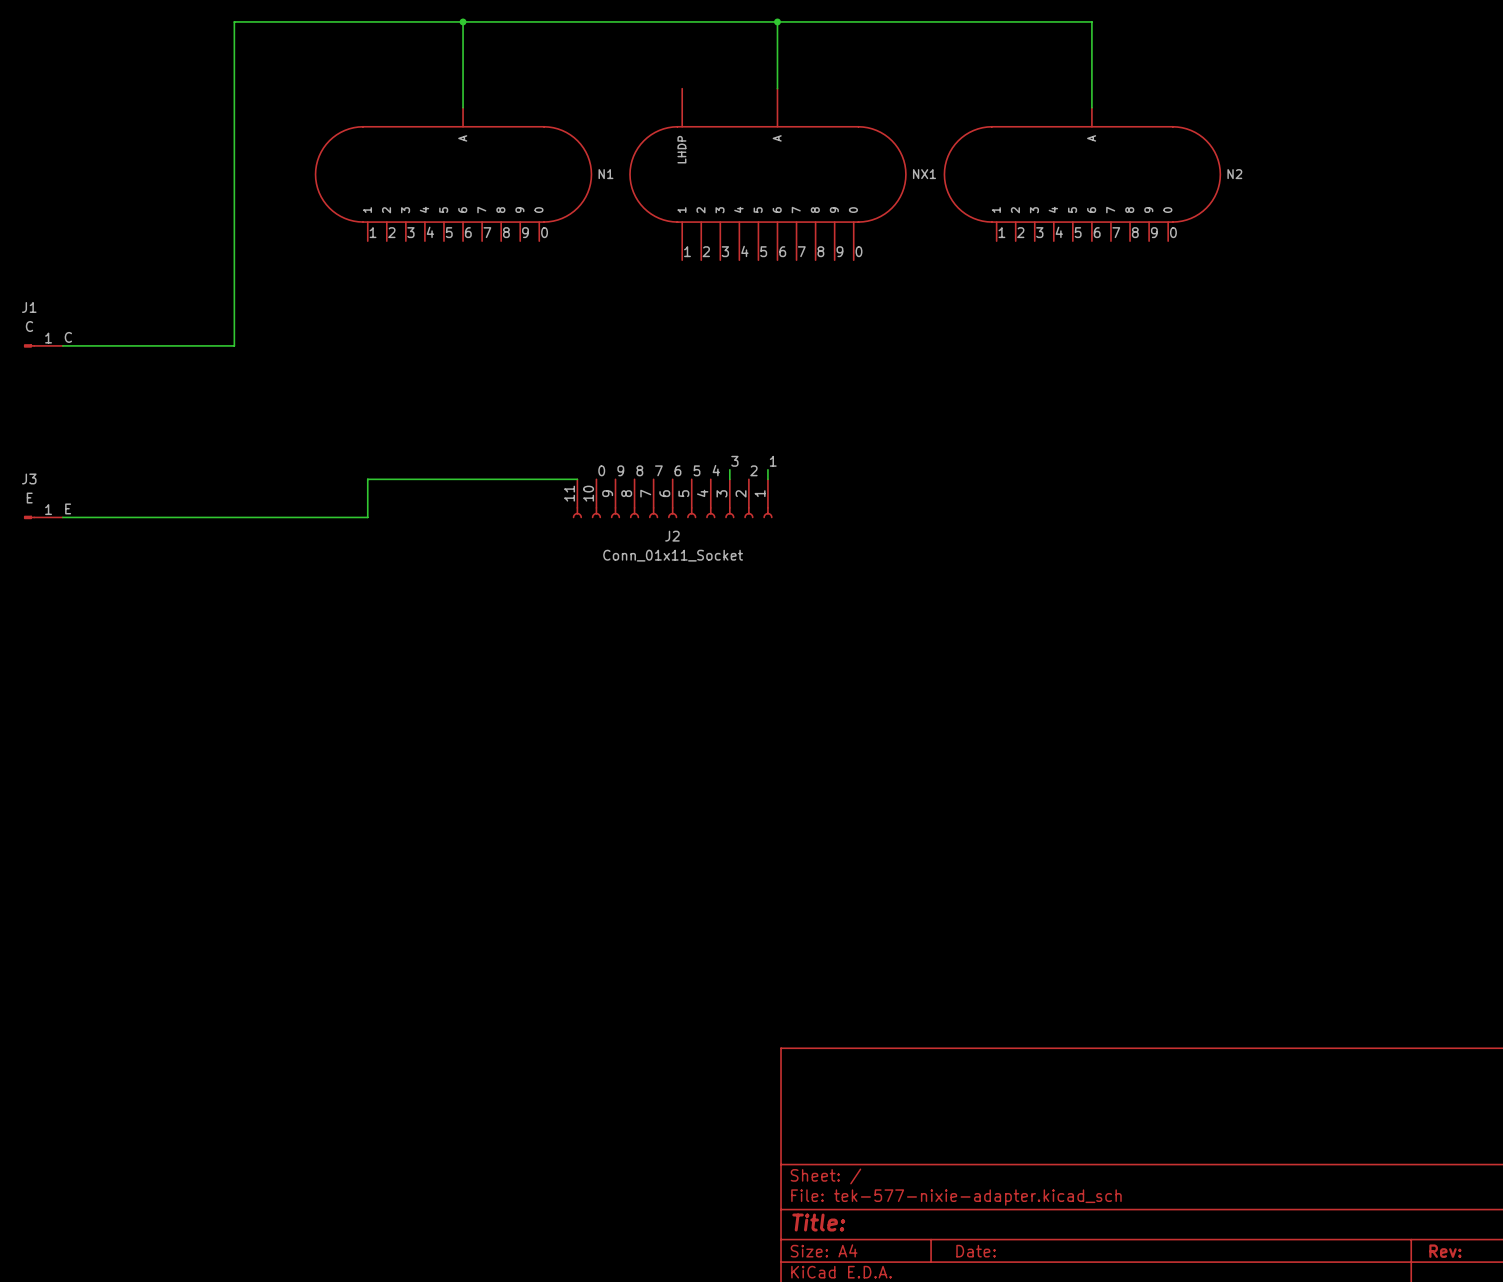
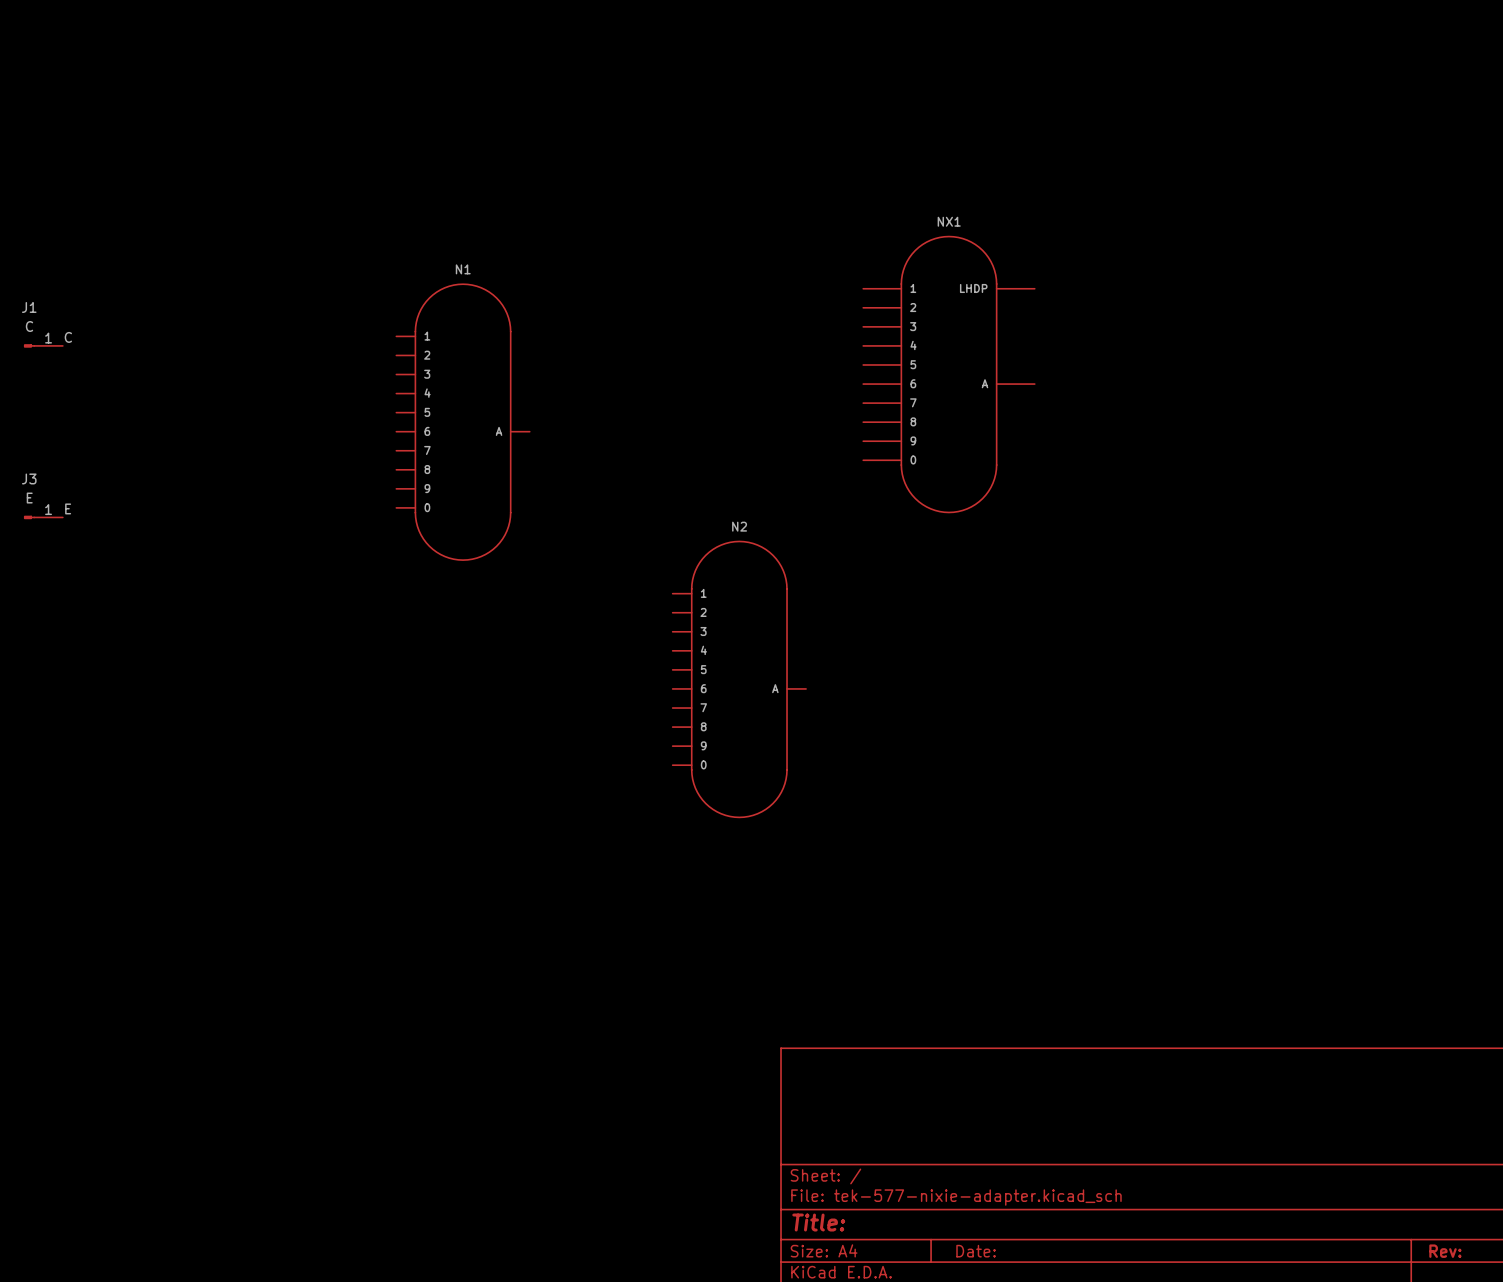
wire: (463, 21) (463, 107) -> none
junction: (463, 21) -> none
wire: (777, 21) (777, 88) -> none
junction: (777, 21) -> none
wire: (1091, 107) (1091, 21) (234, 21) (234, 345) (62, 345) -> none
N1 rotation: 0° (453, 174) -> 90° clockwise (463, 422)
N1 position: (453, 174) -> (463, 422)
N1 name position: N1 (605, 174) -> N1 (463, 269)
NX1 rotation: 0° (767, 174) -> 90° clockwise (948, 374)
NX1 position: (767, 174) -> (948, 374)
NX1 name position: NX1 (924, 174) -> NX1 (949, 221)
N2 rotation: 0° (1082, 174) -> 90° clockwise (739, 679)
N2 position: (1082, 174) -> (739, 679)
N2 name position: N2 (1234, 174) -> N2 (739, 526)
label: 1 (373, 232) -> none
label: 2 (391, 232) -> none
label: 3 (410, 232) -> none
label: 4 (430, 232) -> none
label: 5 (449, 232) -> none
label: 6 (468, 232) -> none
label: 7 (487, 232) -> none
label: 8 (506, 232) -> none
label: 9 (525, 232) -> none
label: 0 (544, 232) -> none
label: 1 (1001, 232) -> none
label: 2 (1020, 232) -> none
label: 3 (1039, 232) -> none
label: 4 (1059, 232) -> none
label: 5 (1078, 232) -> none
label: 6 (1097, 232) -> none
label: 7 (1116, 232) -> none
label: 8 (1135, 232) -> none
label: 9 (1154, 232) -> none
label: 0 (1173, 232) -> none
label: 1 (687, 251) -> none
label: 2 (706, 251) -> none
label: 3 (725, 251) -> none
label: 4 (744, 251) -> none
label: 5 (763, 251) -> none
label: 6 (782, 251) -> none
label: 7 (801, 251) -> none
label: 8 (820, 251) -> none
label: 9 (839, 251) -> none
label: 0 (858, 251) -> none
label: 3 (734, 461) -> none
label: 1 (773, 461) -> none
wire: (729, 469) (729, 479) -> none
wire: (767, 469) (767, 479) -> none
label: 0 (601, 470) -> none
label: 9 (620, 470) -> none
label: 8 (639, 470) -> none
label: 7 (658, 470) -> none
label: 6 (677, 470) -> none
label: 5 (697, 470) -> none
label: 4 (716, 470) -> none
label: 2 (753, 470) -> none
wire: (577, 479) (367, 479) (367, 517) (62, 517) -> none
J2: Conn_01x11_Socket (672, 498) -> none

